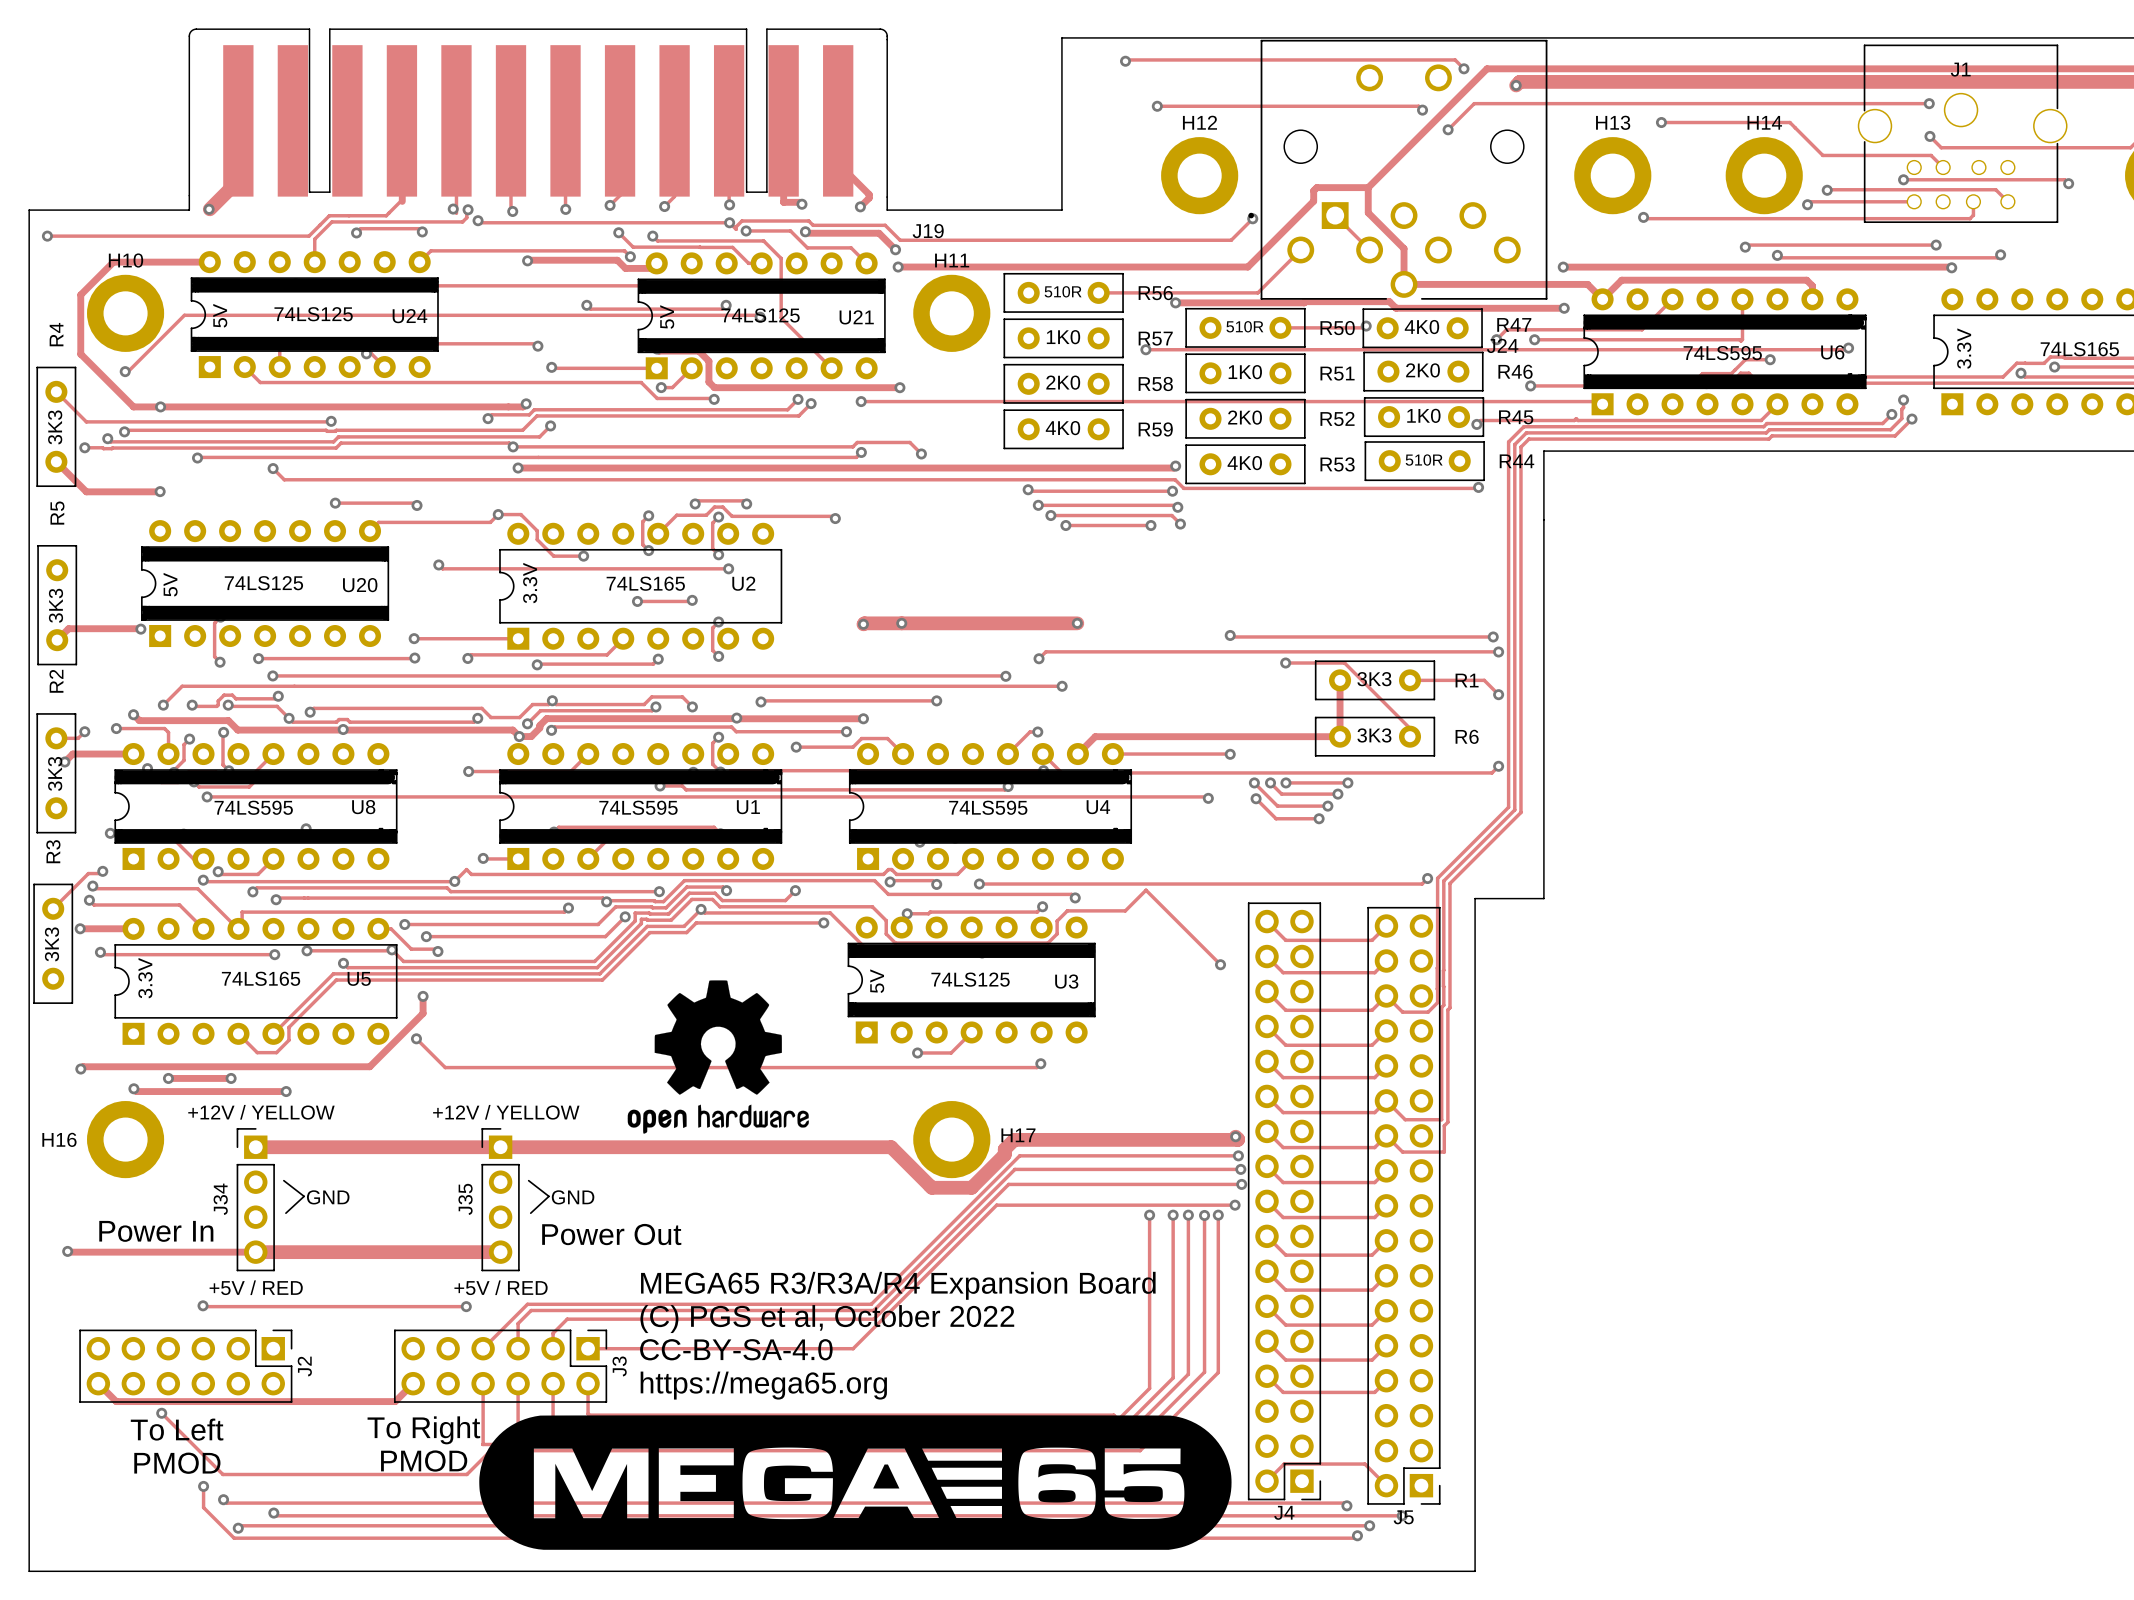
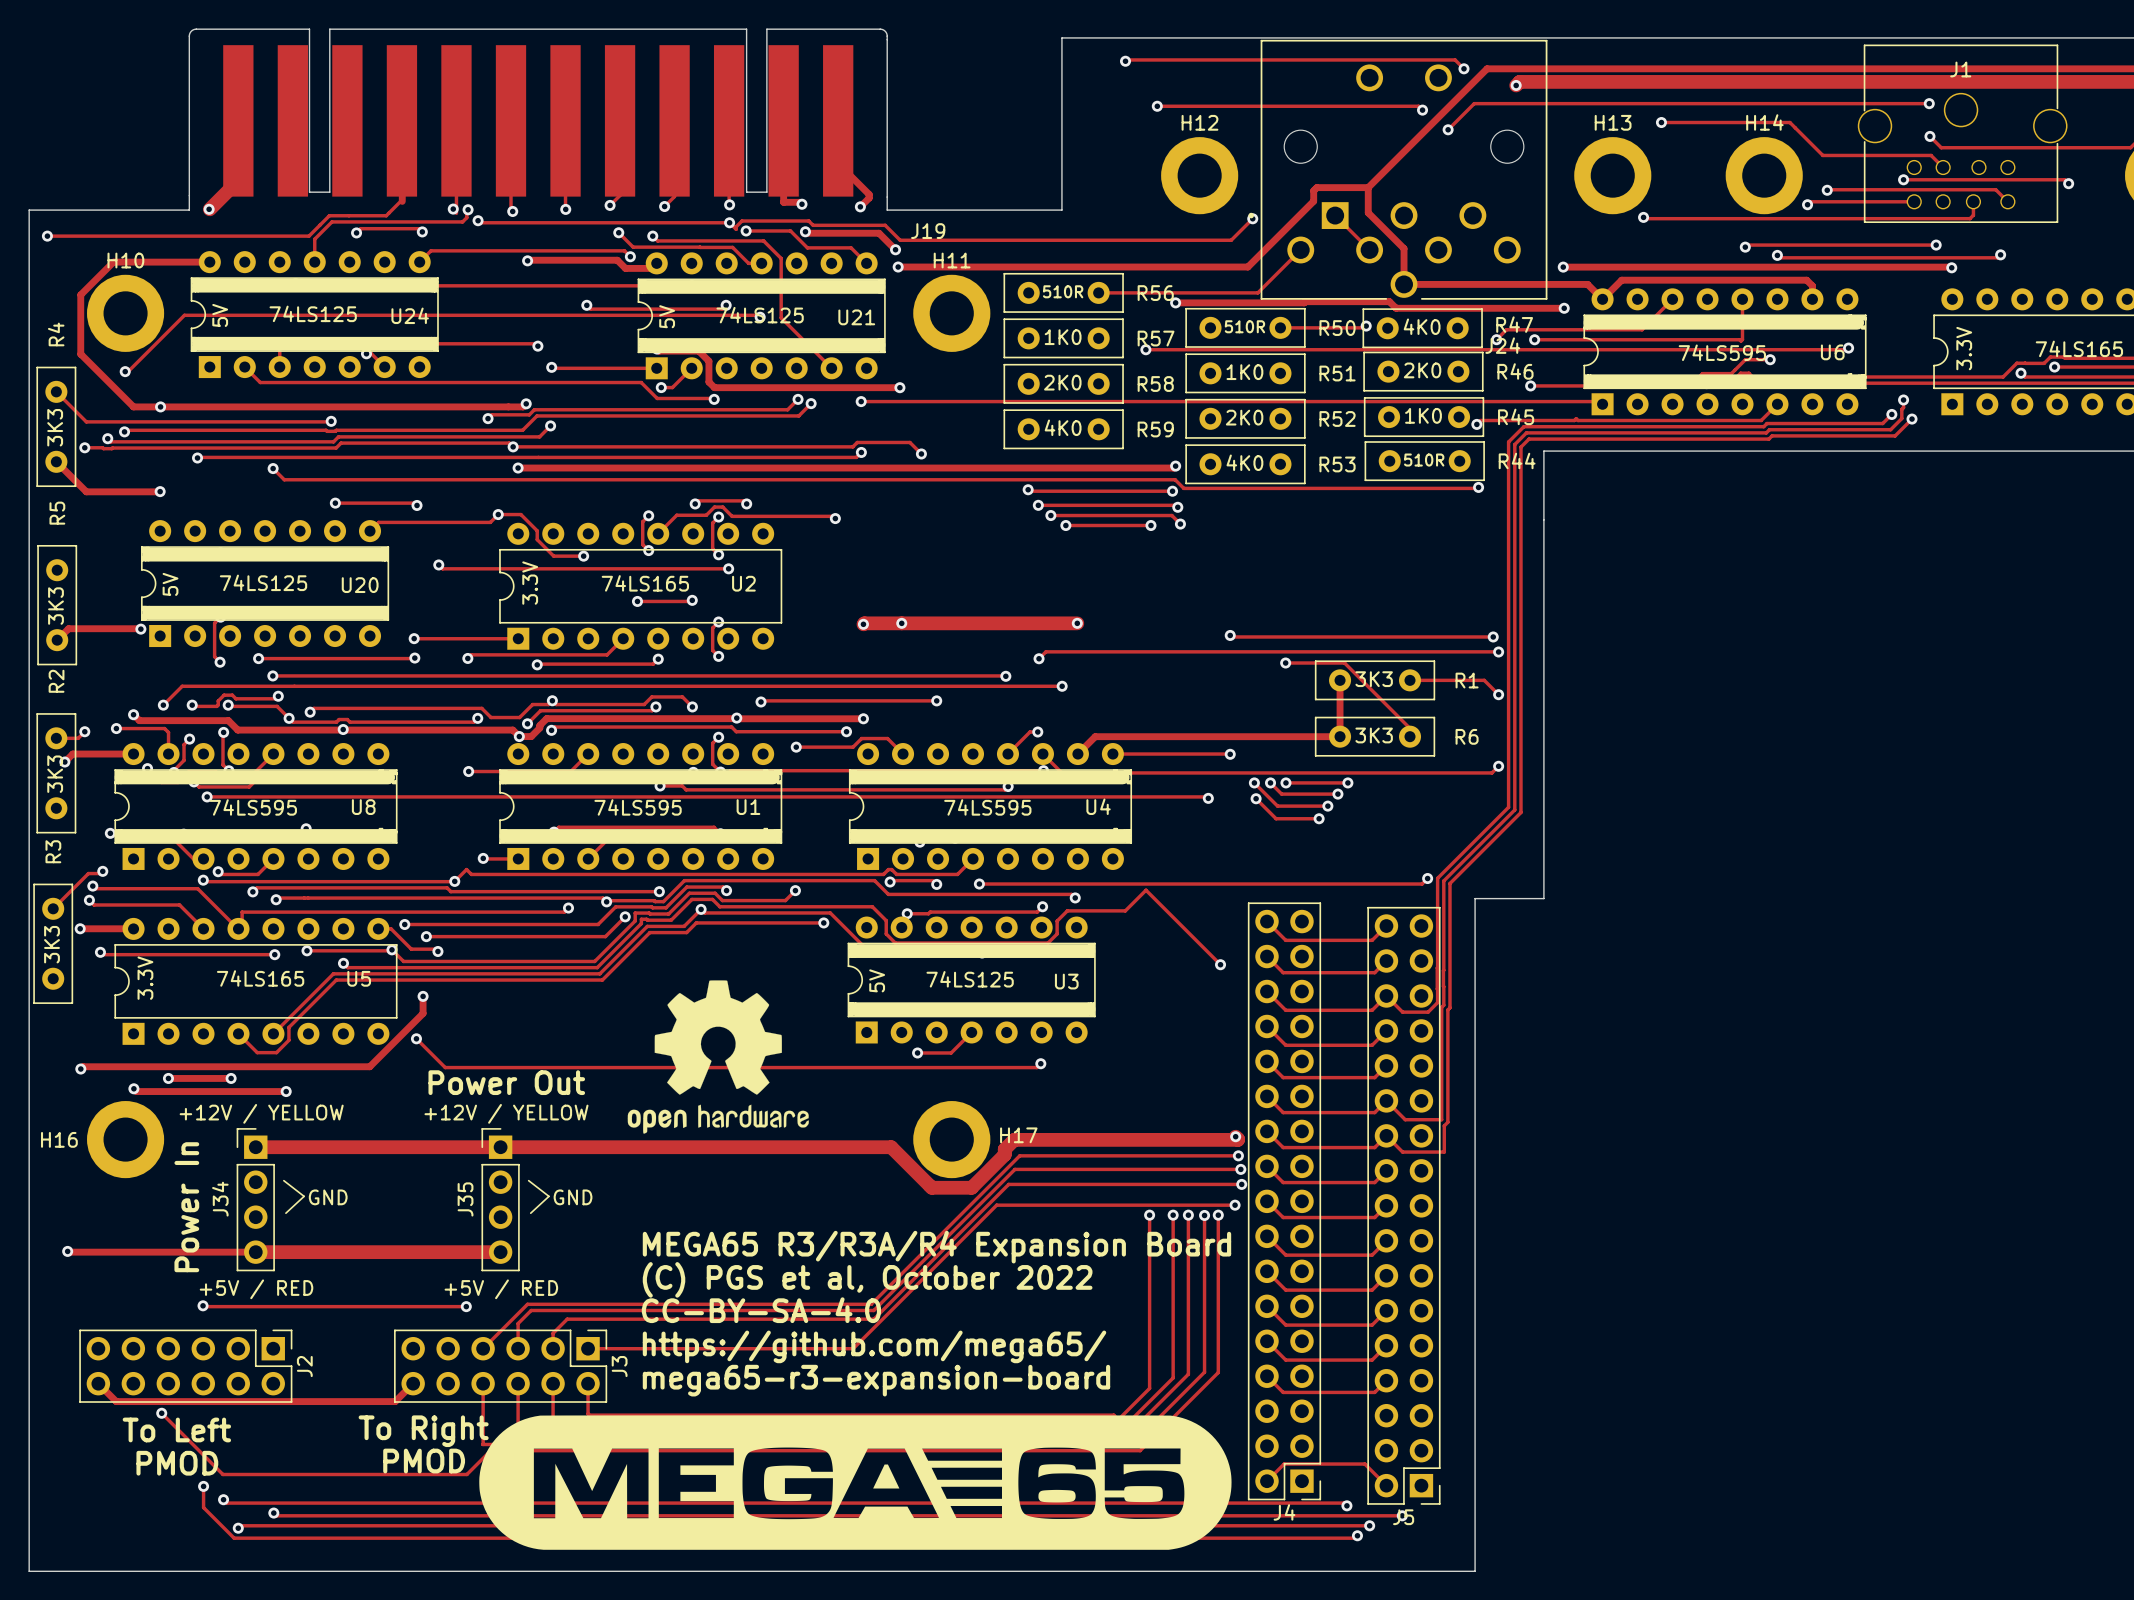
text rotation: 0° (156, 1231) -> 90° counterclockwise (186, 1207)
text position: Power Out (611, 1234) -> Power Out (506, 1082)
text: none -> MEGA65 R3/R3A/R4 Expansion Board (936, 1247)
text: MEGA65 R3/R3A/R4 Expansion Board (898, 1285) -> (C) PGS et al, October 2022 (867, 1279)
text: (C) PGS et al, October 2022 (827, 1319) -> CC-BY-SA-4.0 (761, 1310)
text: CC-BY-SA-4.0 (736, 1349) -> https://github.com/mega65/ (874, 1346)
text: https://mega65.org (763, 1385) -> mega65-r3-expansion-board (876, 1380)

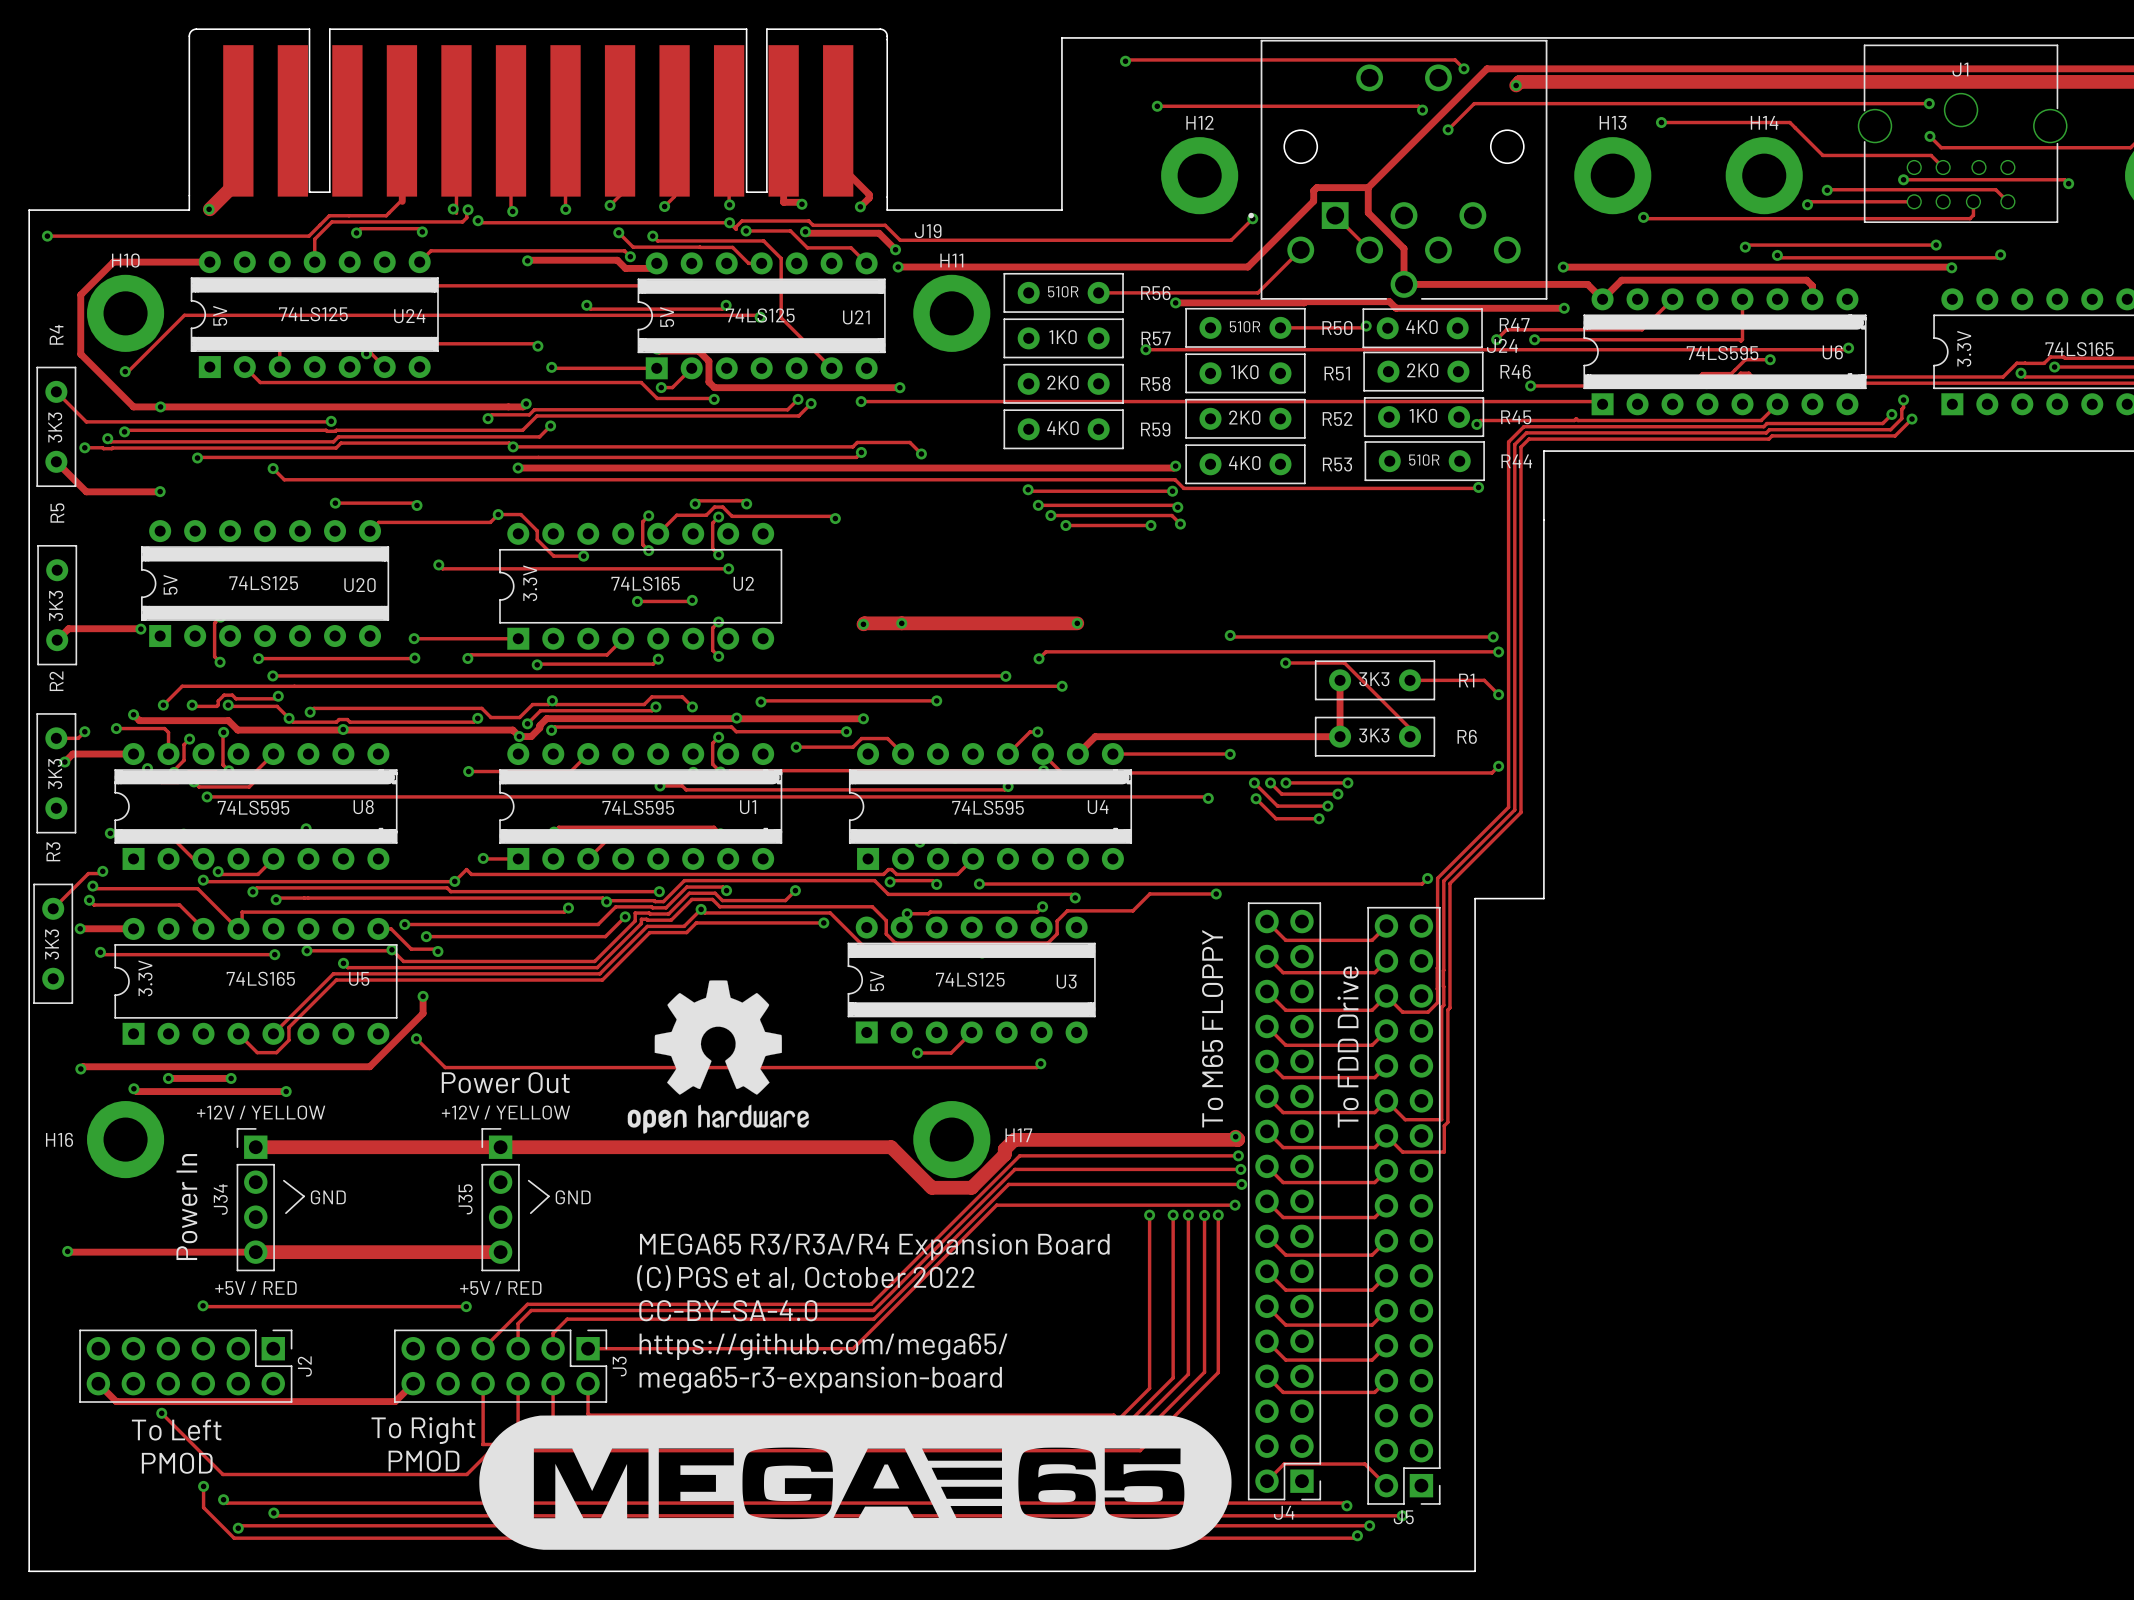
track: (1125, 910) (1146, 890) (1220, 964) -> (1125, 910) (1132, 910) (1149, 894) (1216, 894)
via position: (1220, 964) -> (1216, 894)
text: none -> To M65 FLOPPY (1212, 1028)
text: none -> To FDD Drive (1348, 1047)

